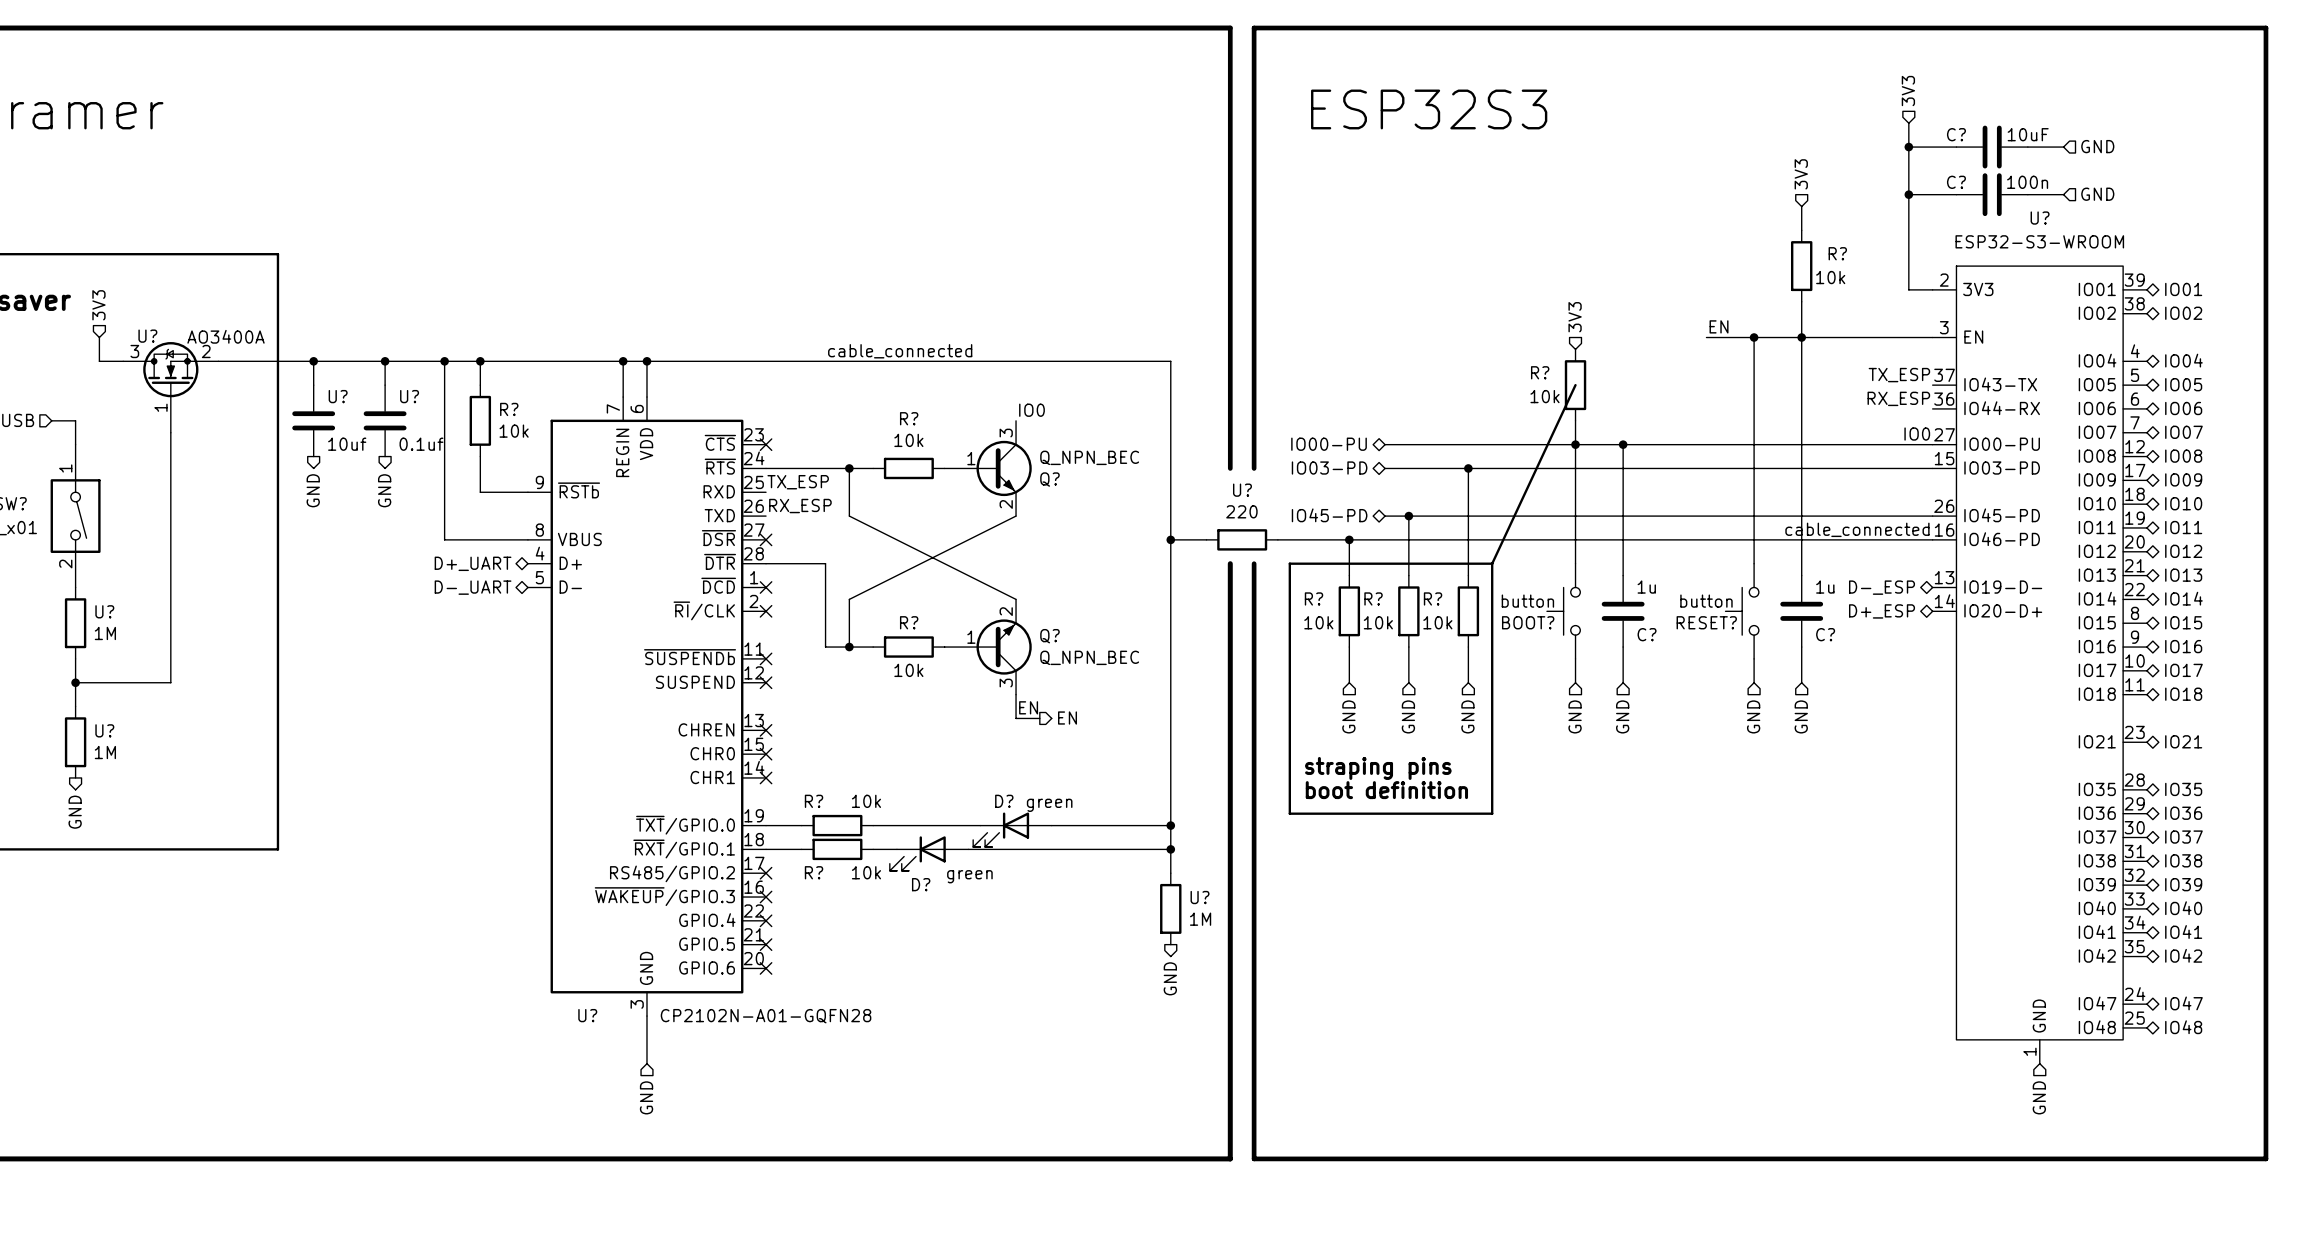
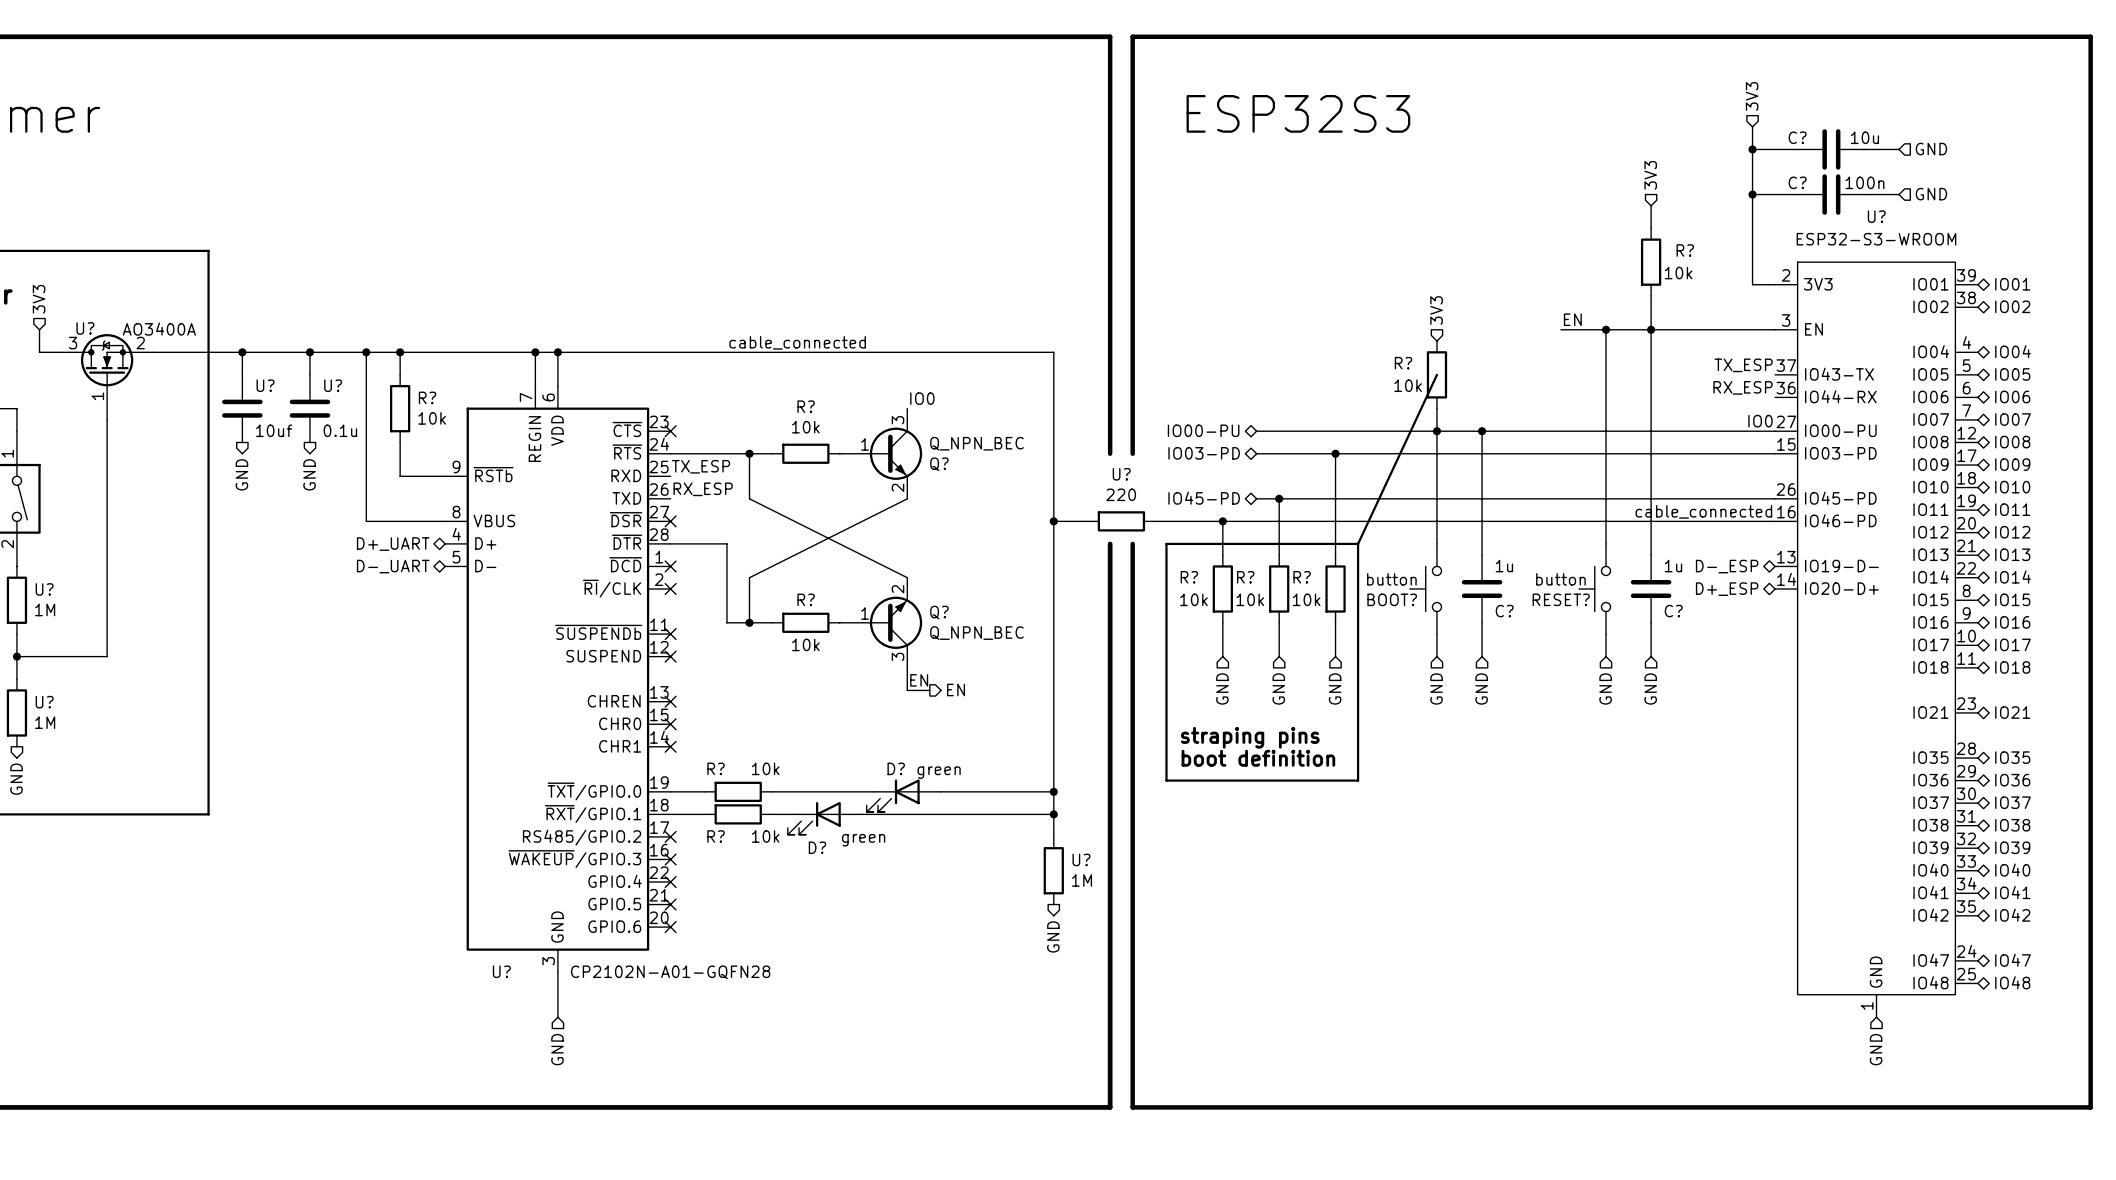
C? value: 10uF (2028, 134) -> 10u (1864, 137)
U? value: 0.1uf (421, 444) -> 0.1u (340, 430)

